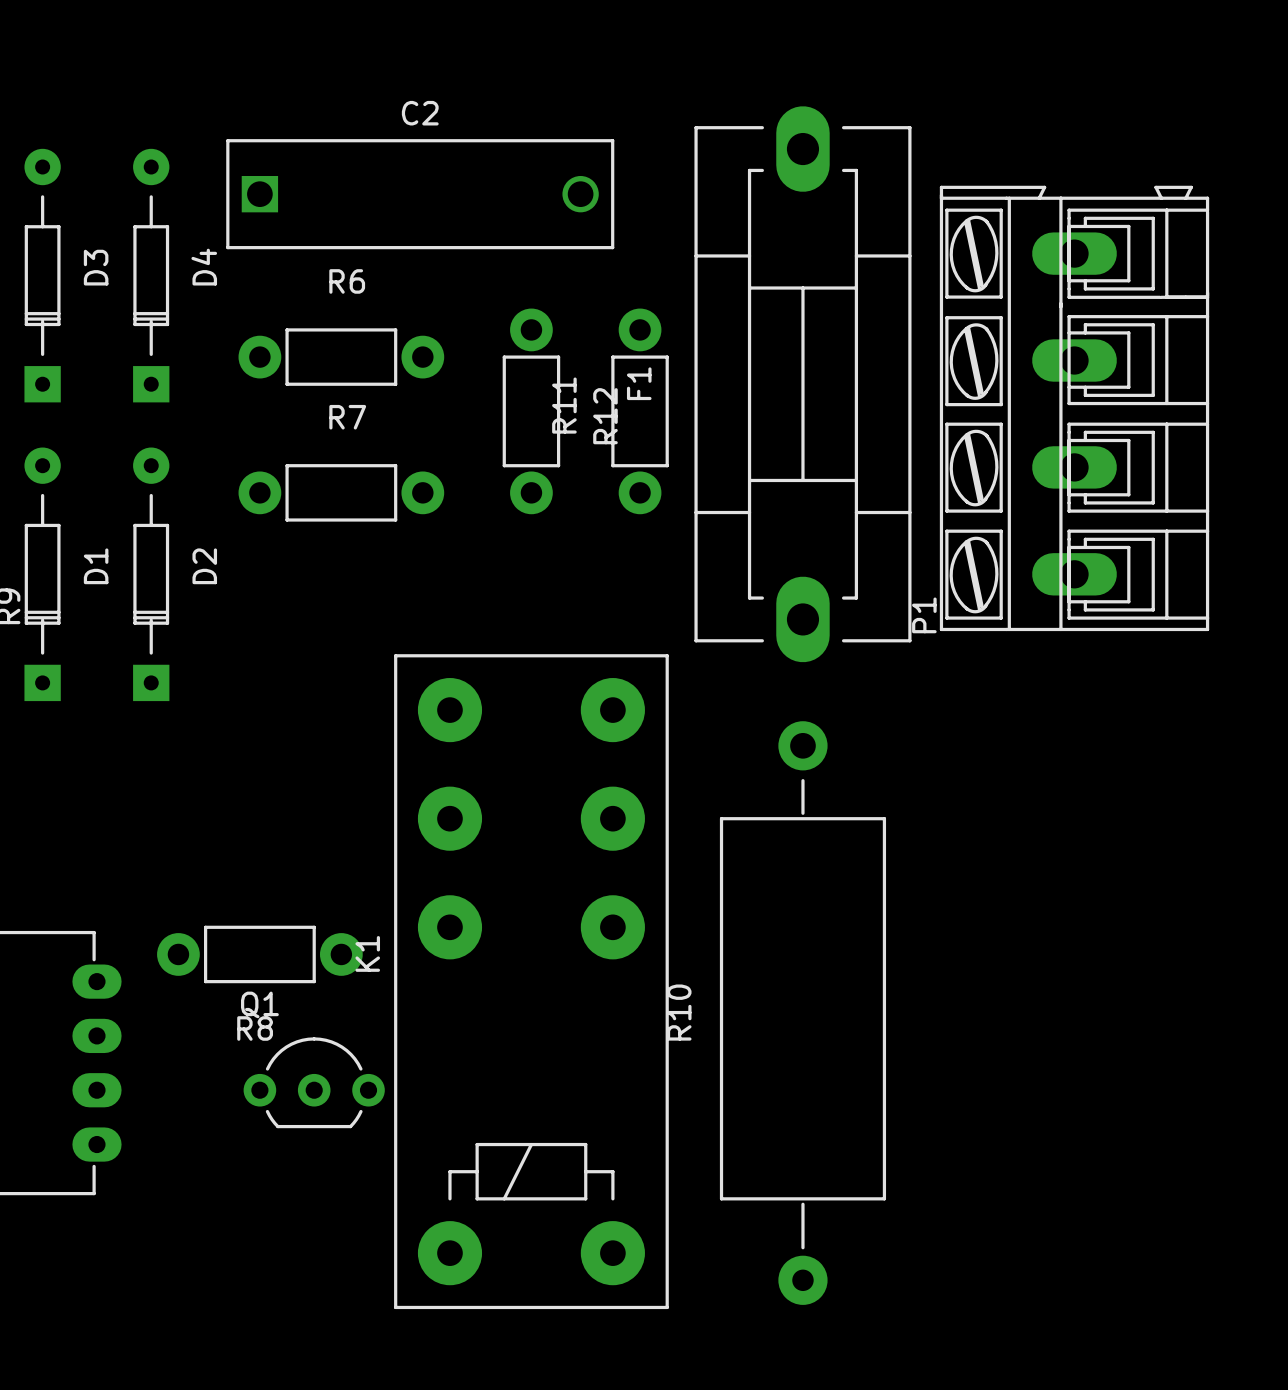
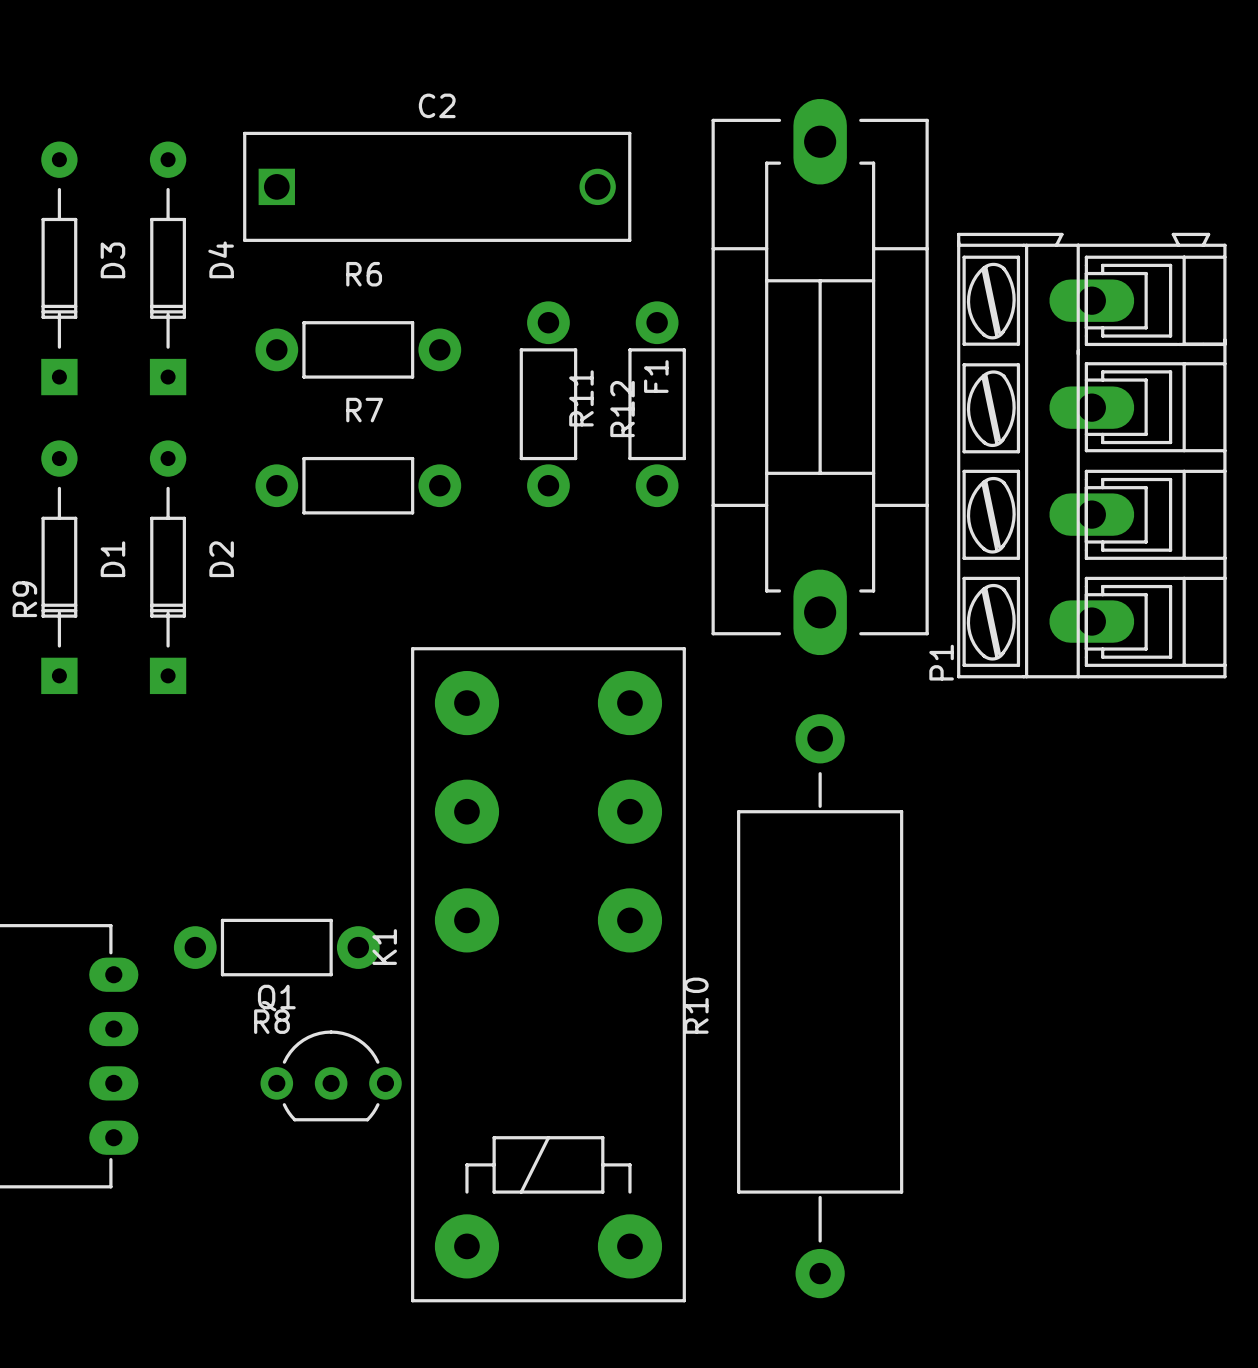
P1 position: (1074, 408) -> (1091, 455)

